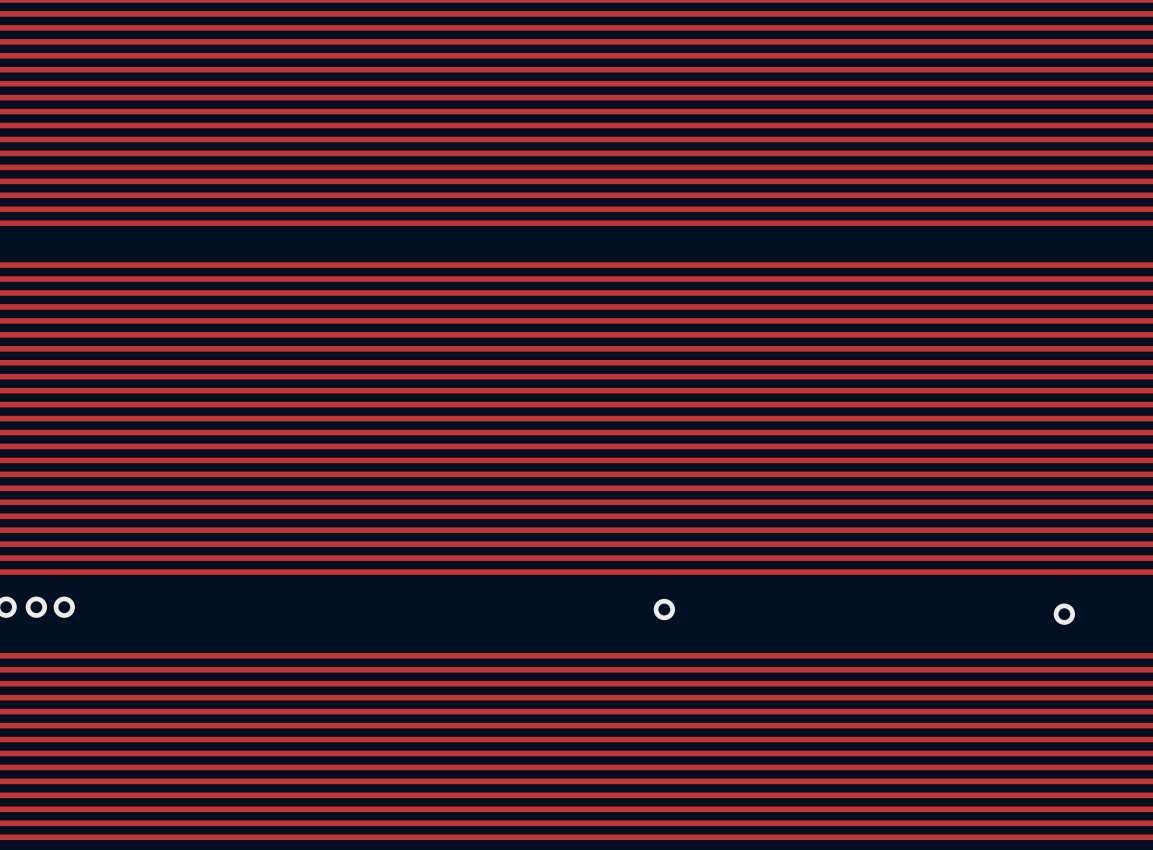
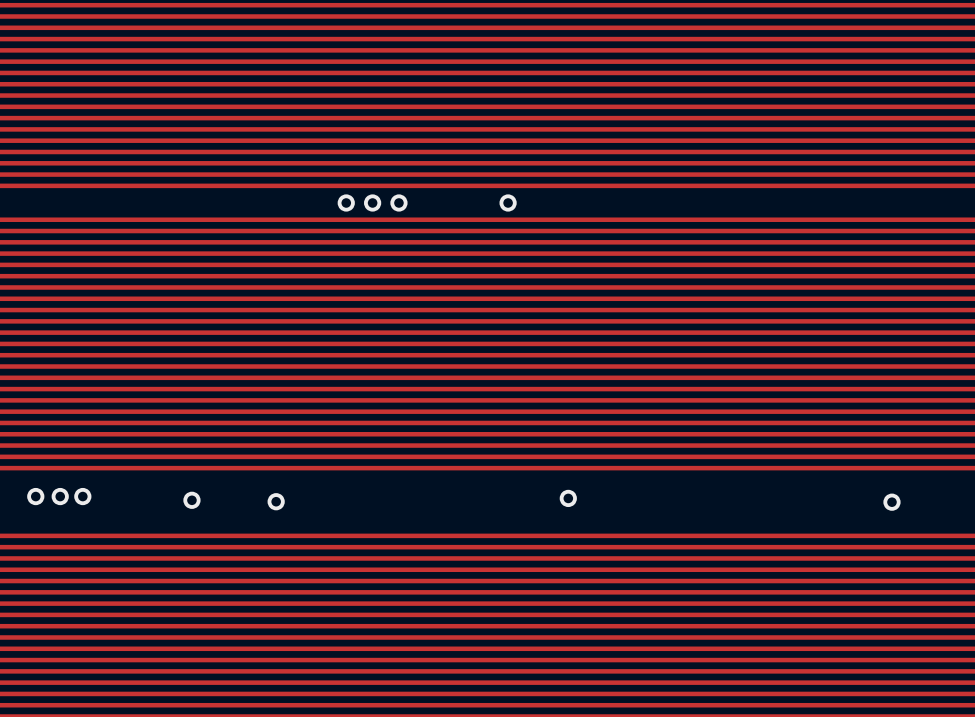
via: none -> (346, 202)
via: none -> (372, 202)
via: none -> (398, 202)
via: none -> (508, 202)
via: none -> (191, 500)
via: none -> (276, 501)

